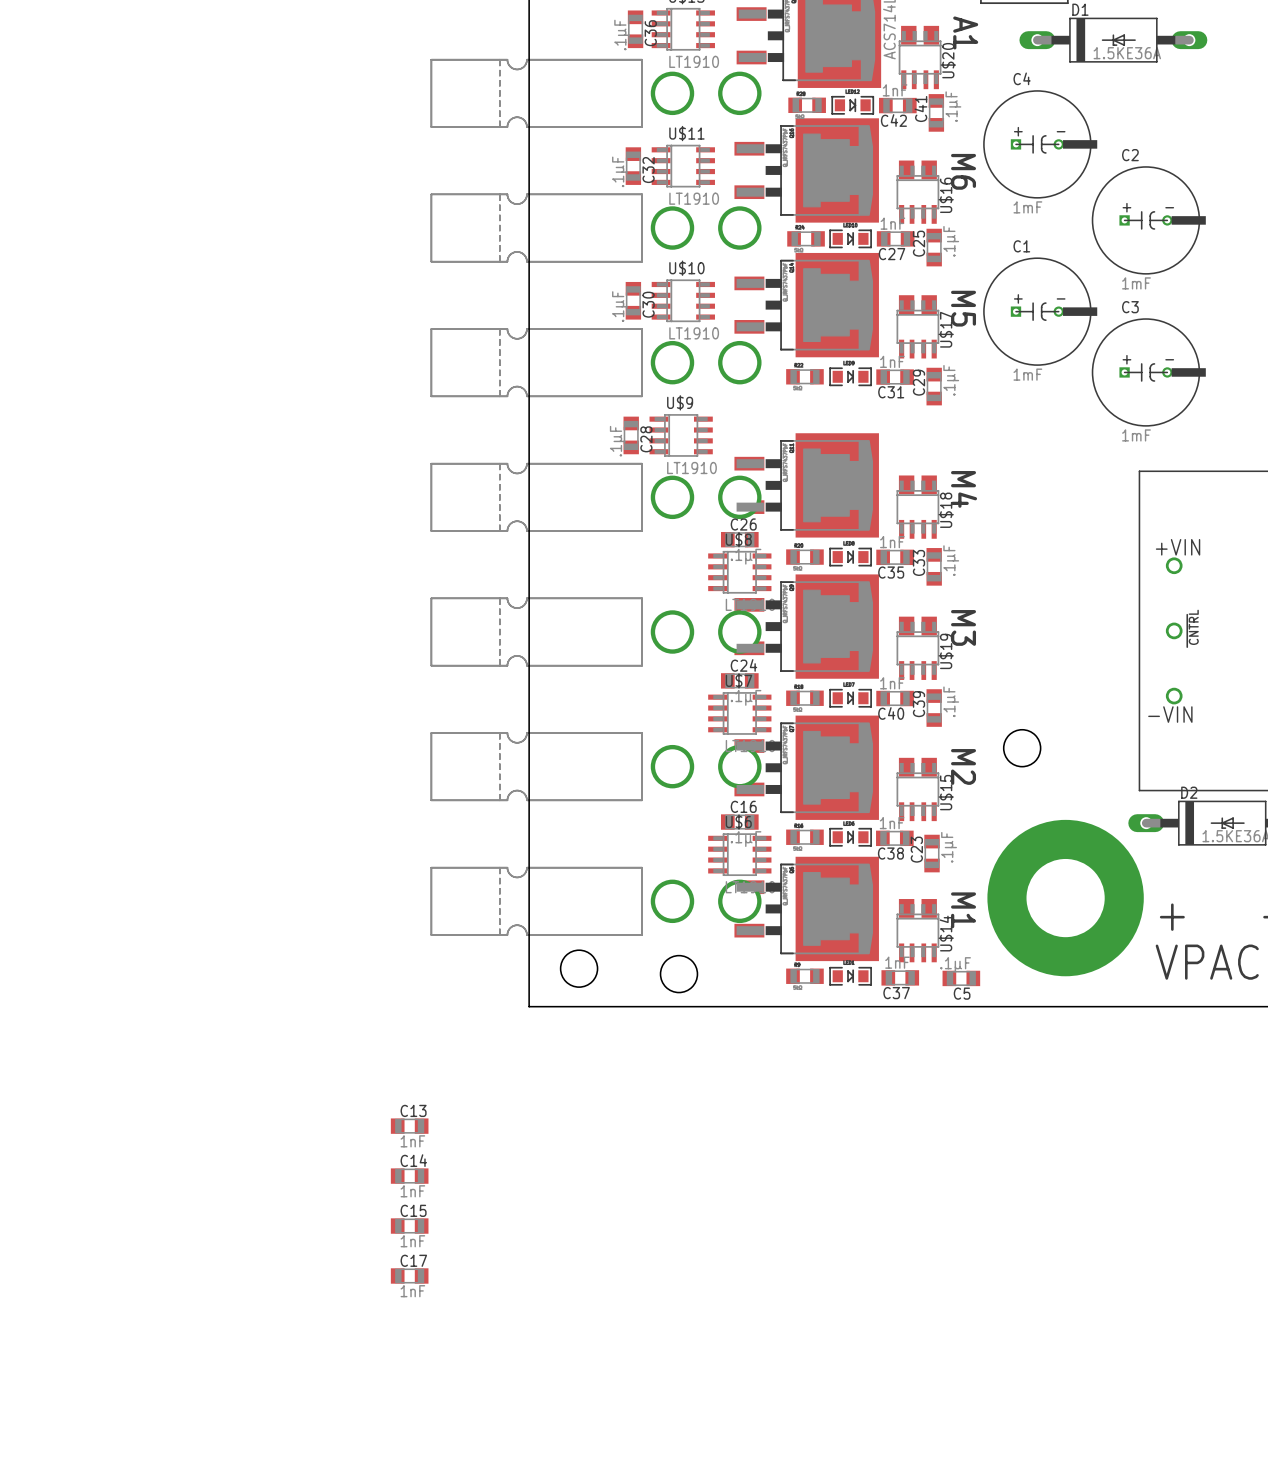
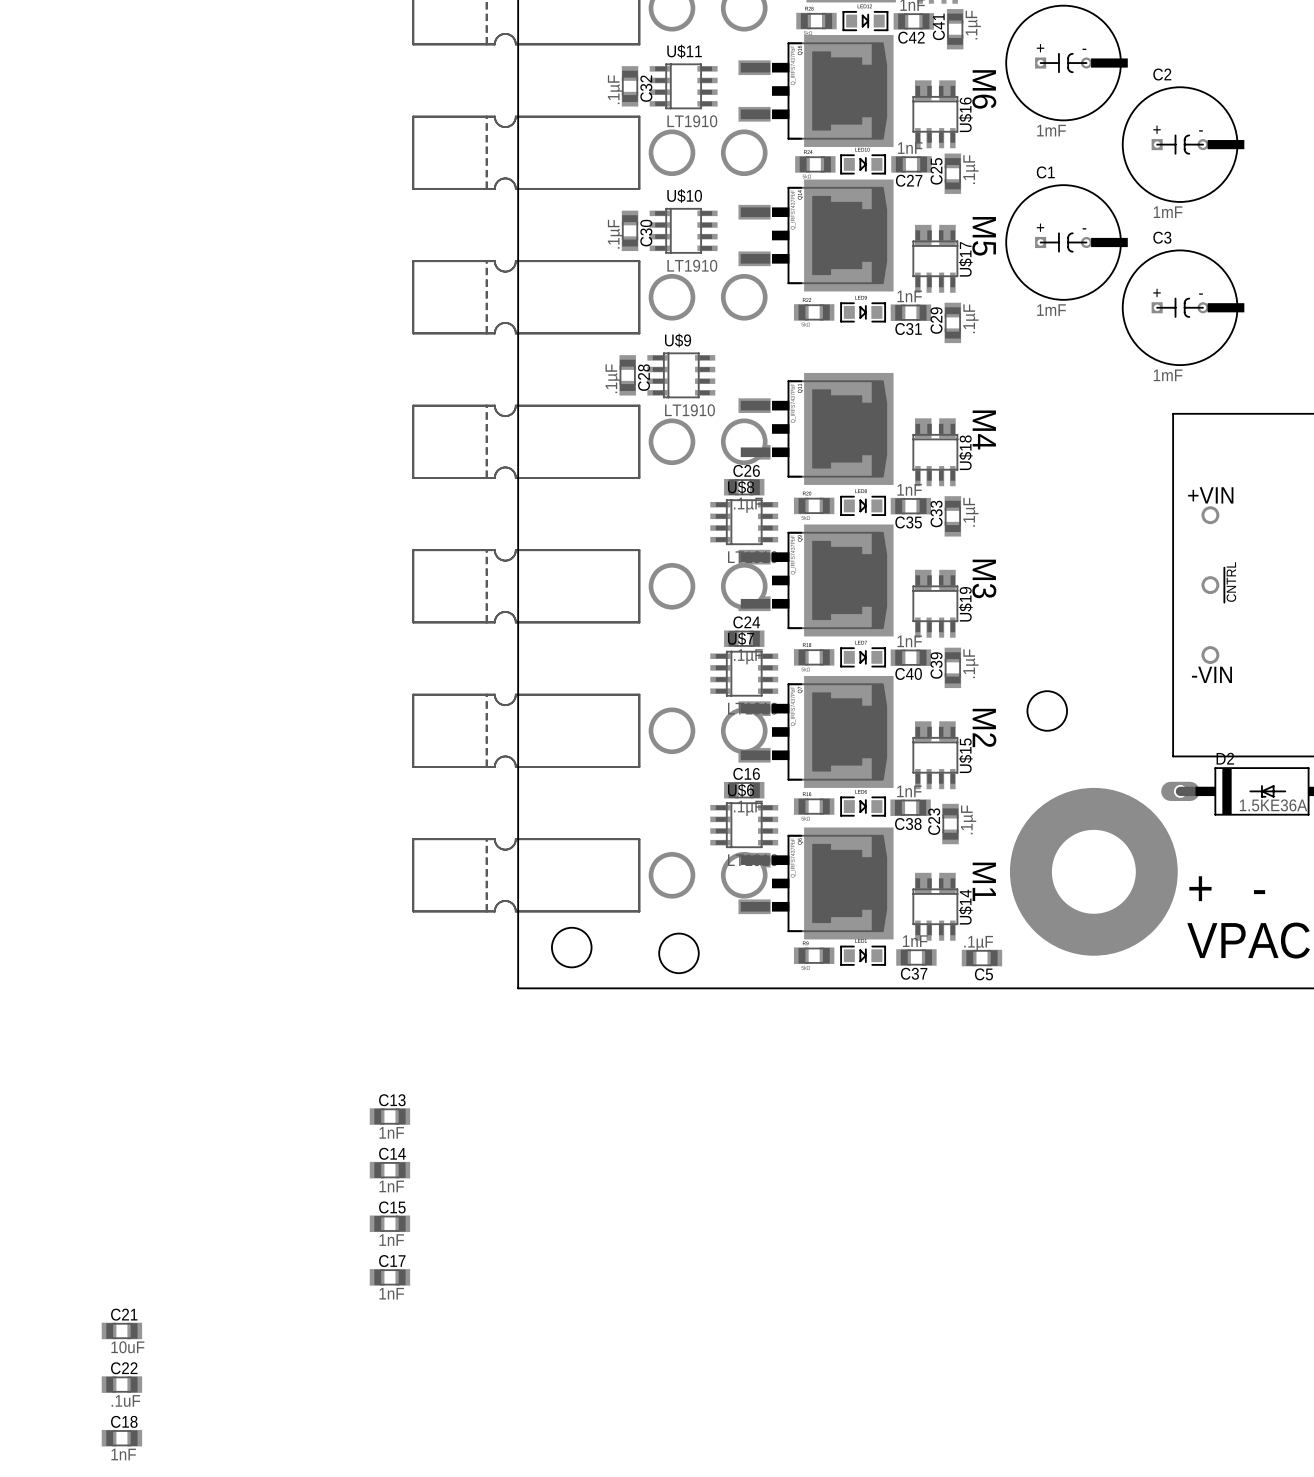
C21: none -> 10uF (121, 1330)
C22: none -> .1uF (121, 1384)
C18: none -> 1nF (121, 1438)

